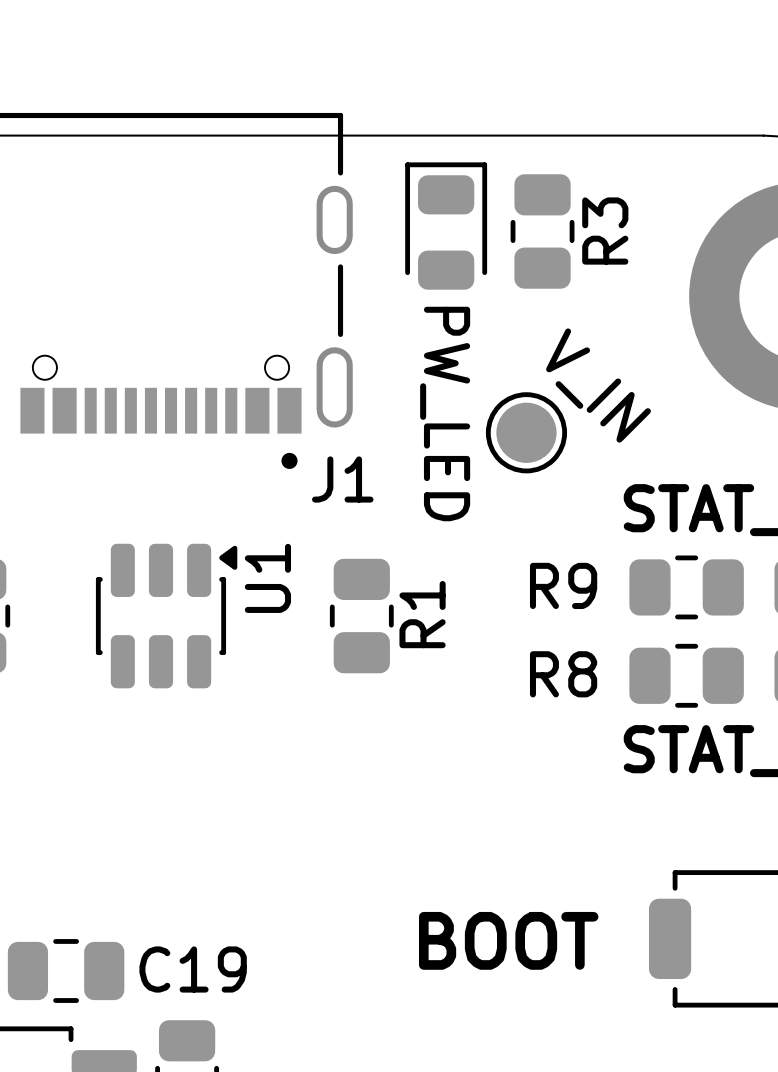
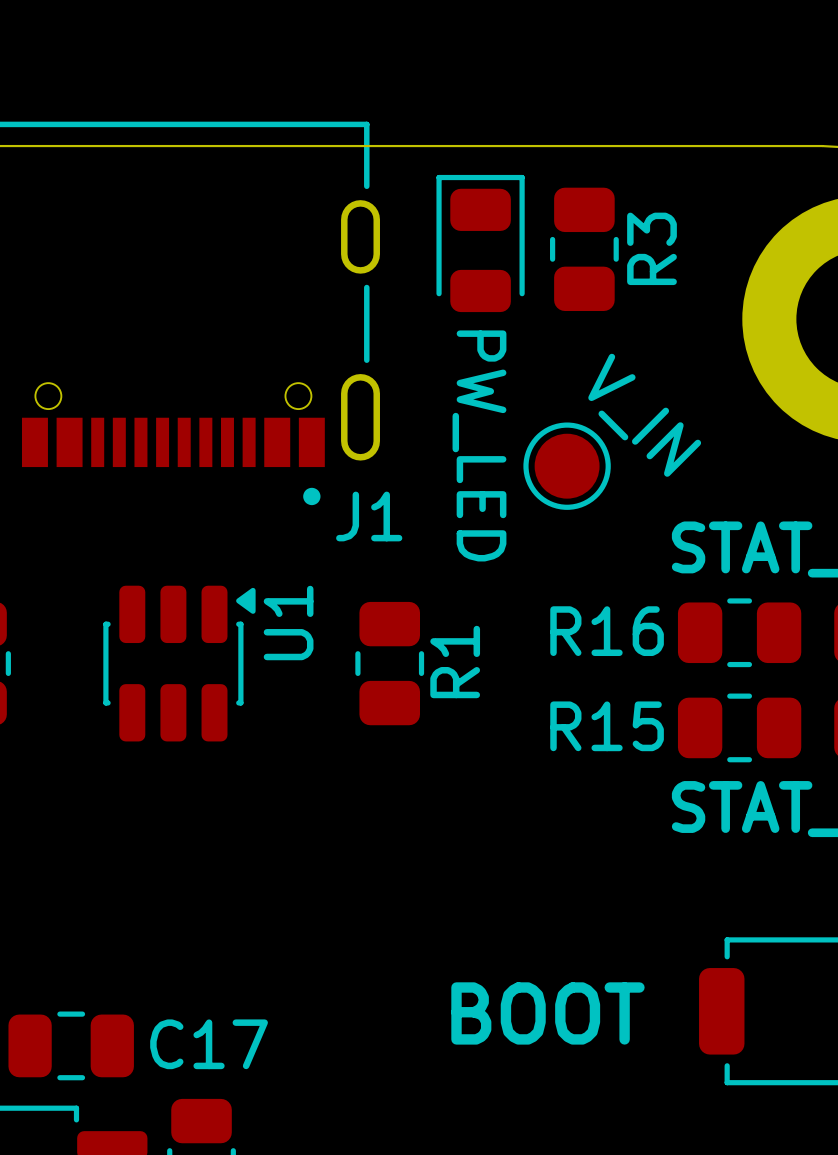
R9 name: R9 (563, 585) -> R16 (607, 631)
R8 name: R8 (563, 674) -> R15 (607, 726)
C19 name: C19 (193, 969) -> C17 (209, 1044)

